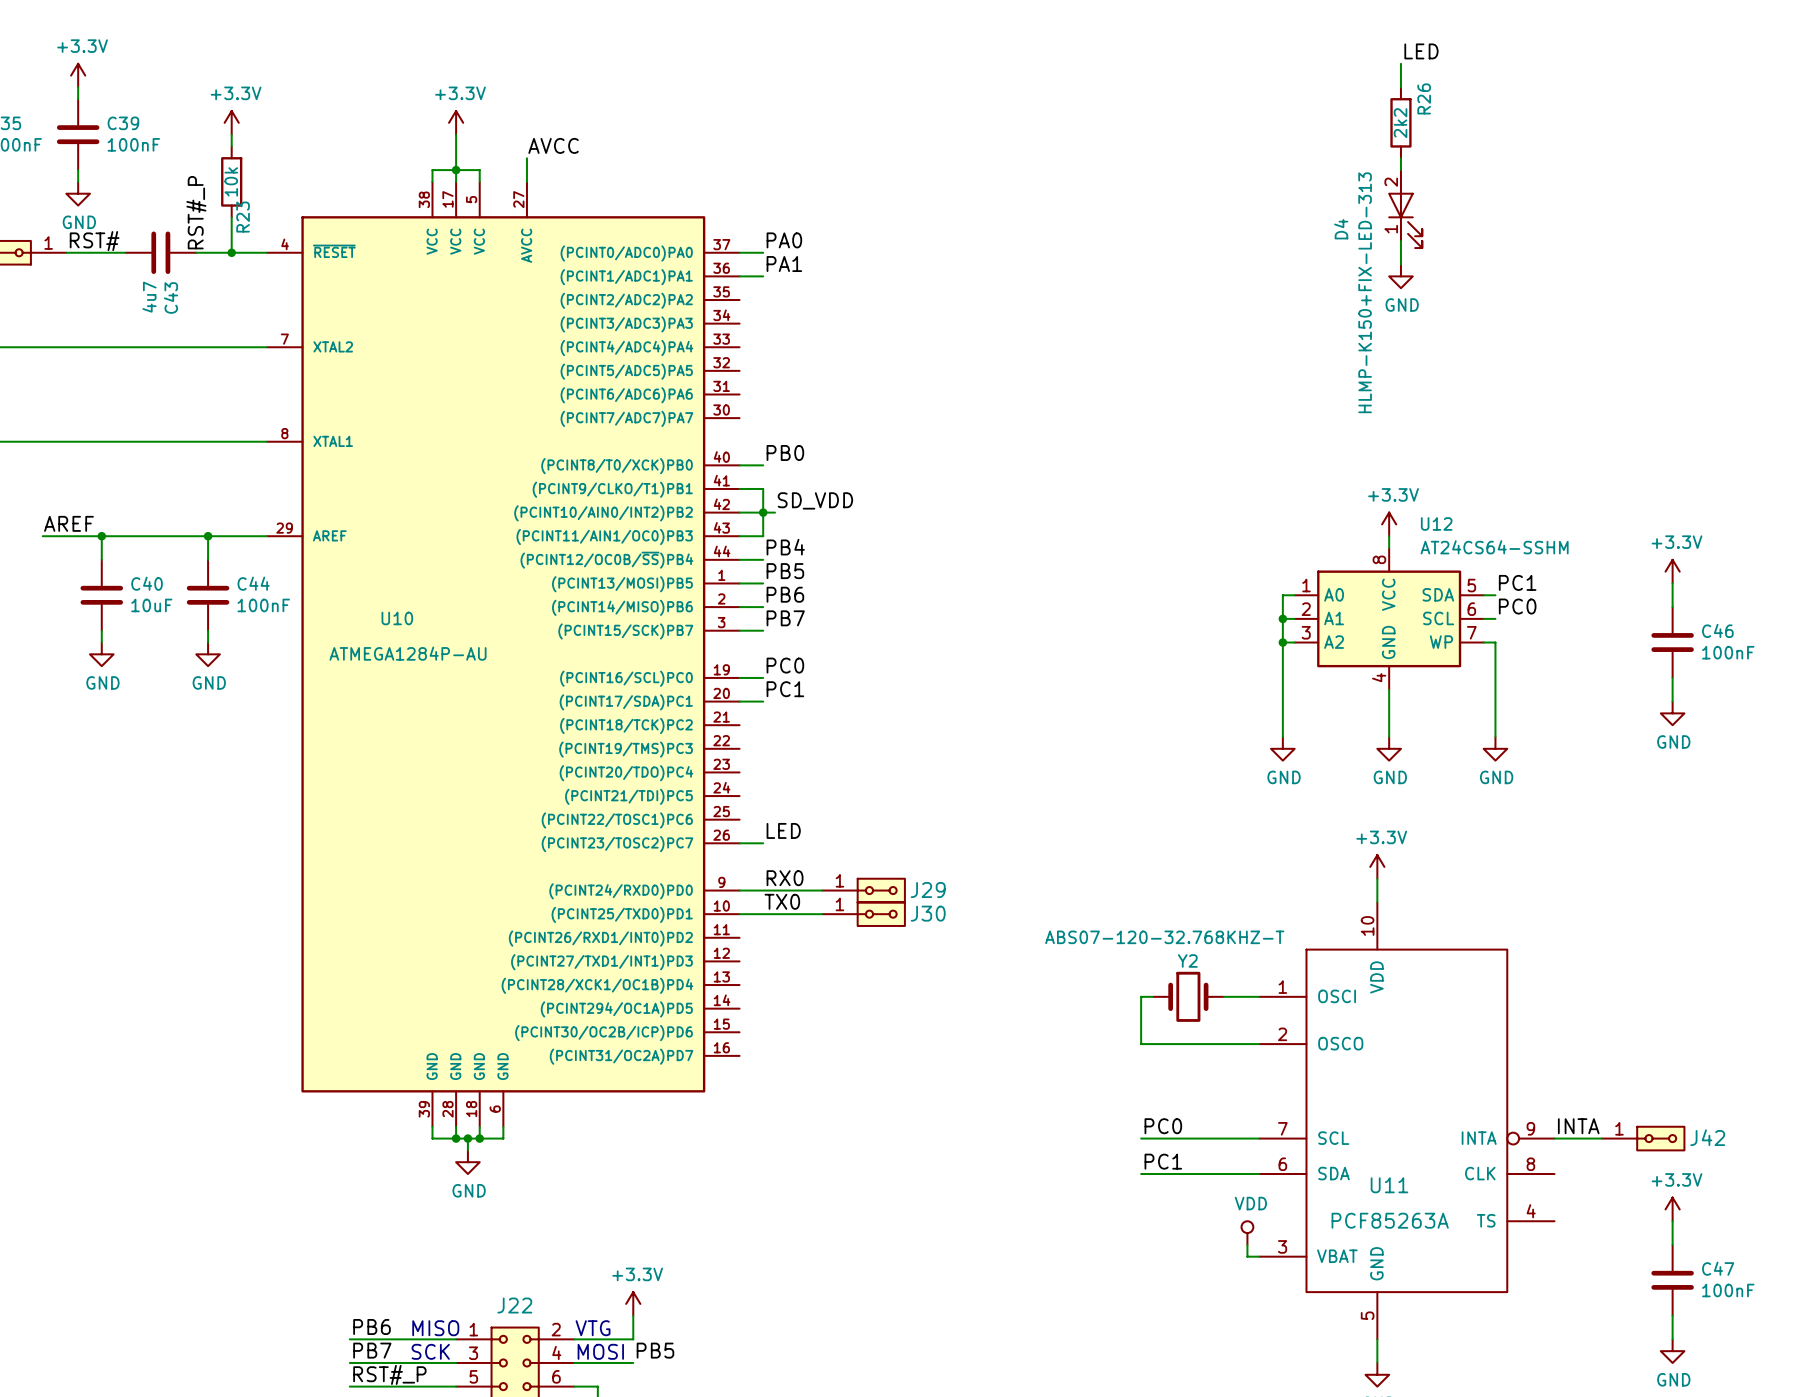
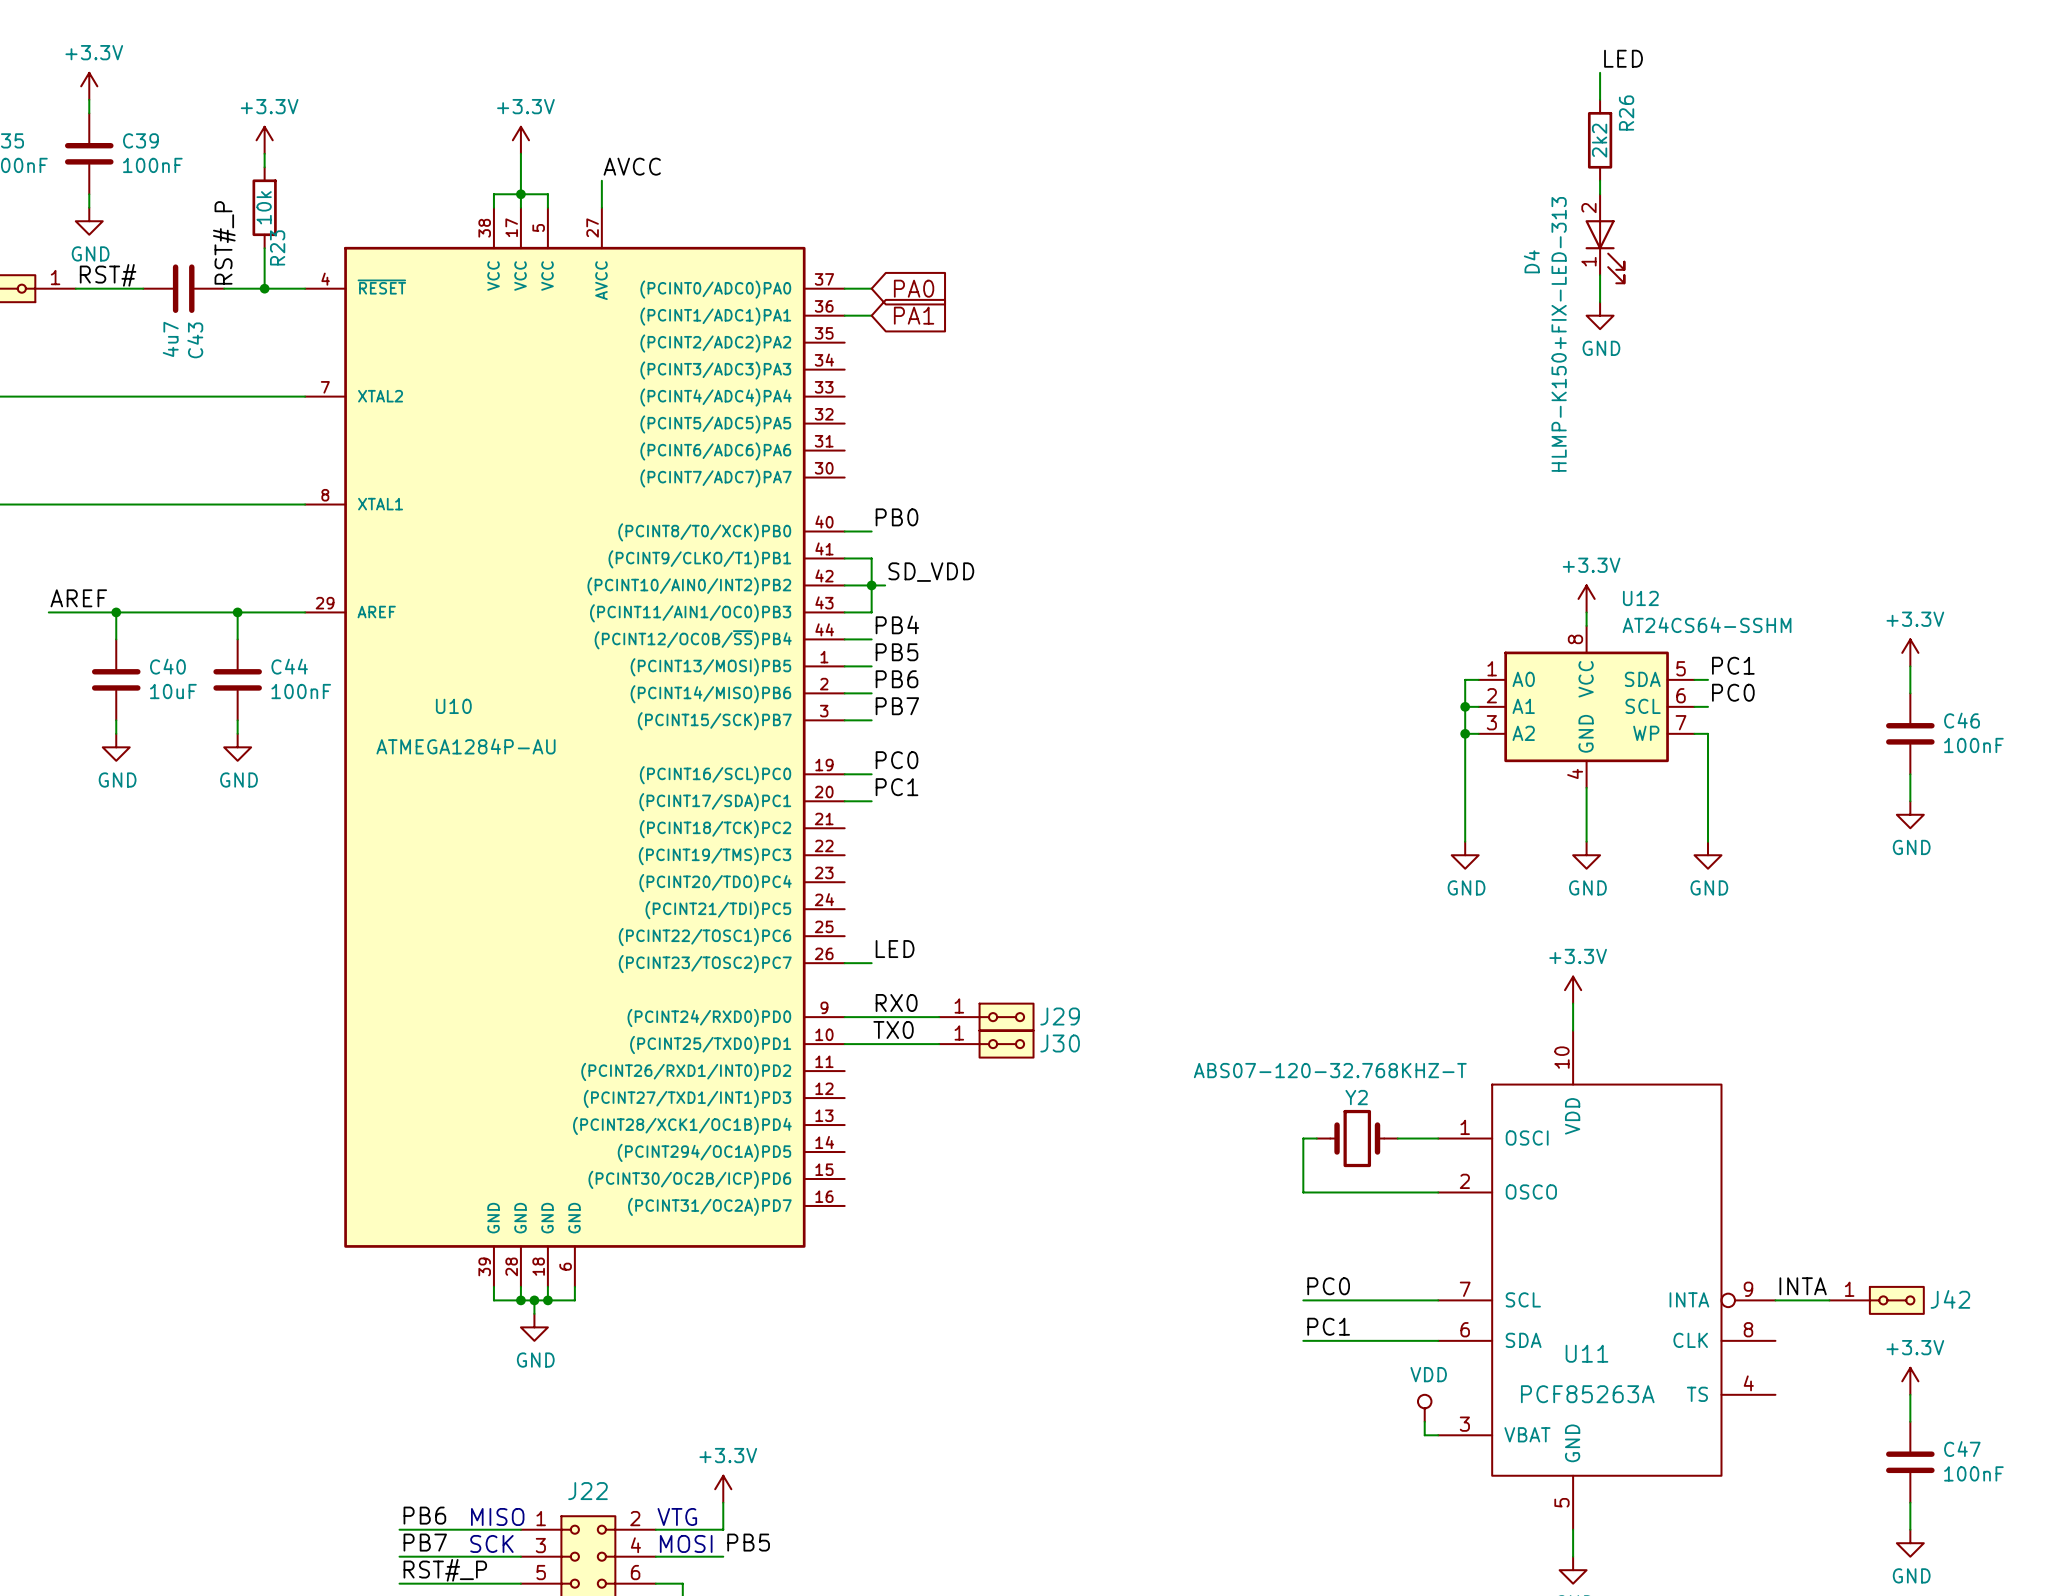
label: PA0 (784, 240) -> none
global label: none -> PA0 (914, 288)
label: PA1 (784, 264) -> none
global label: none -> PA1 (914, 315)

